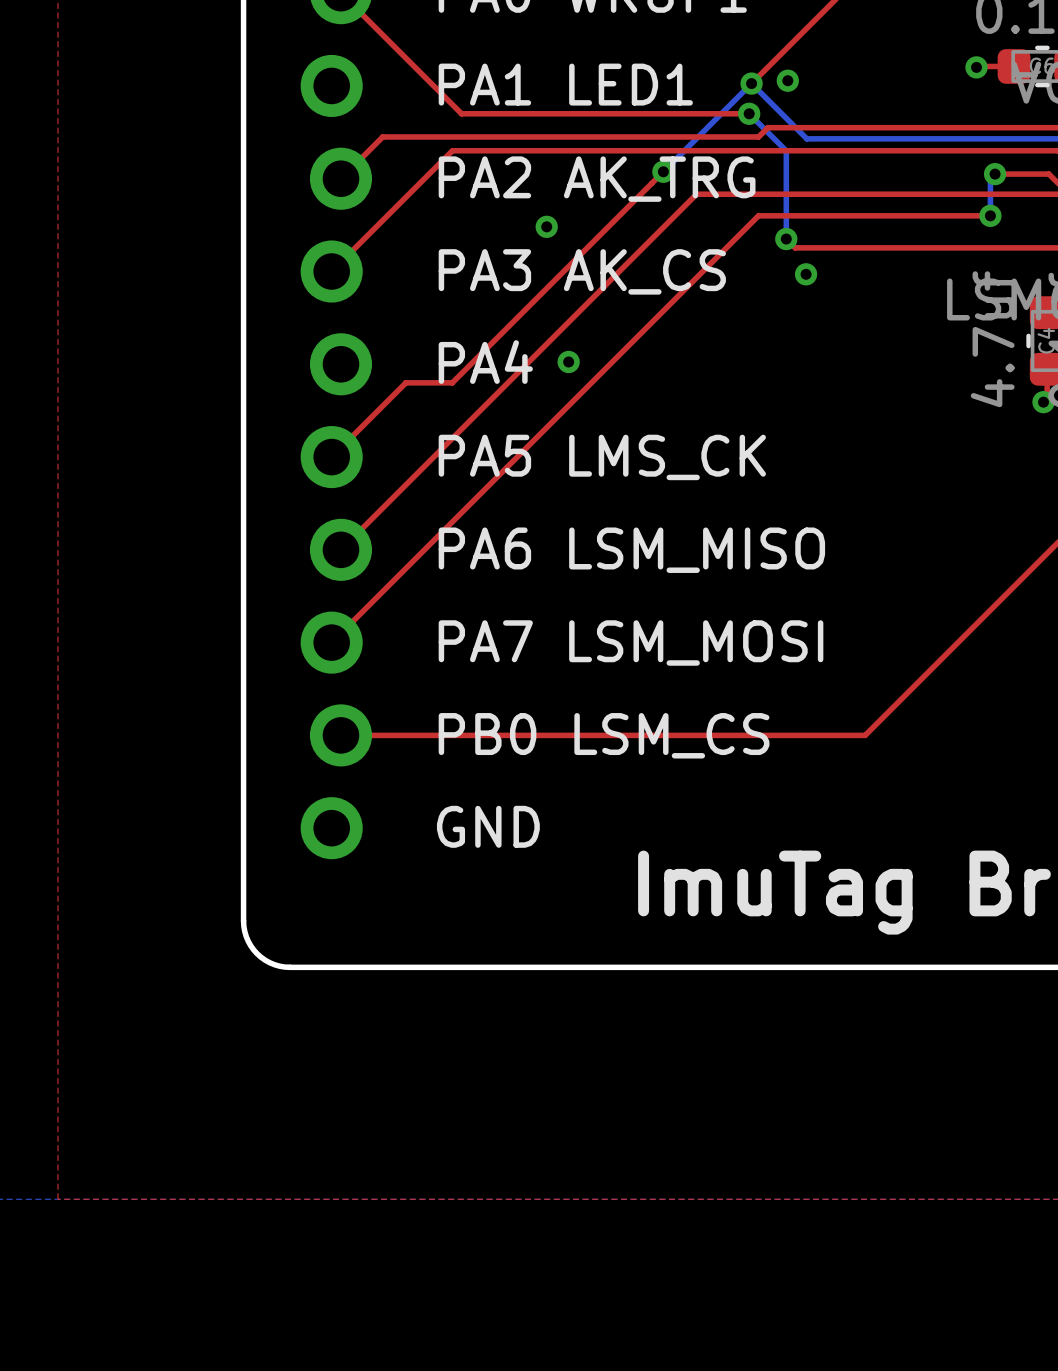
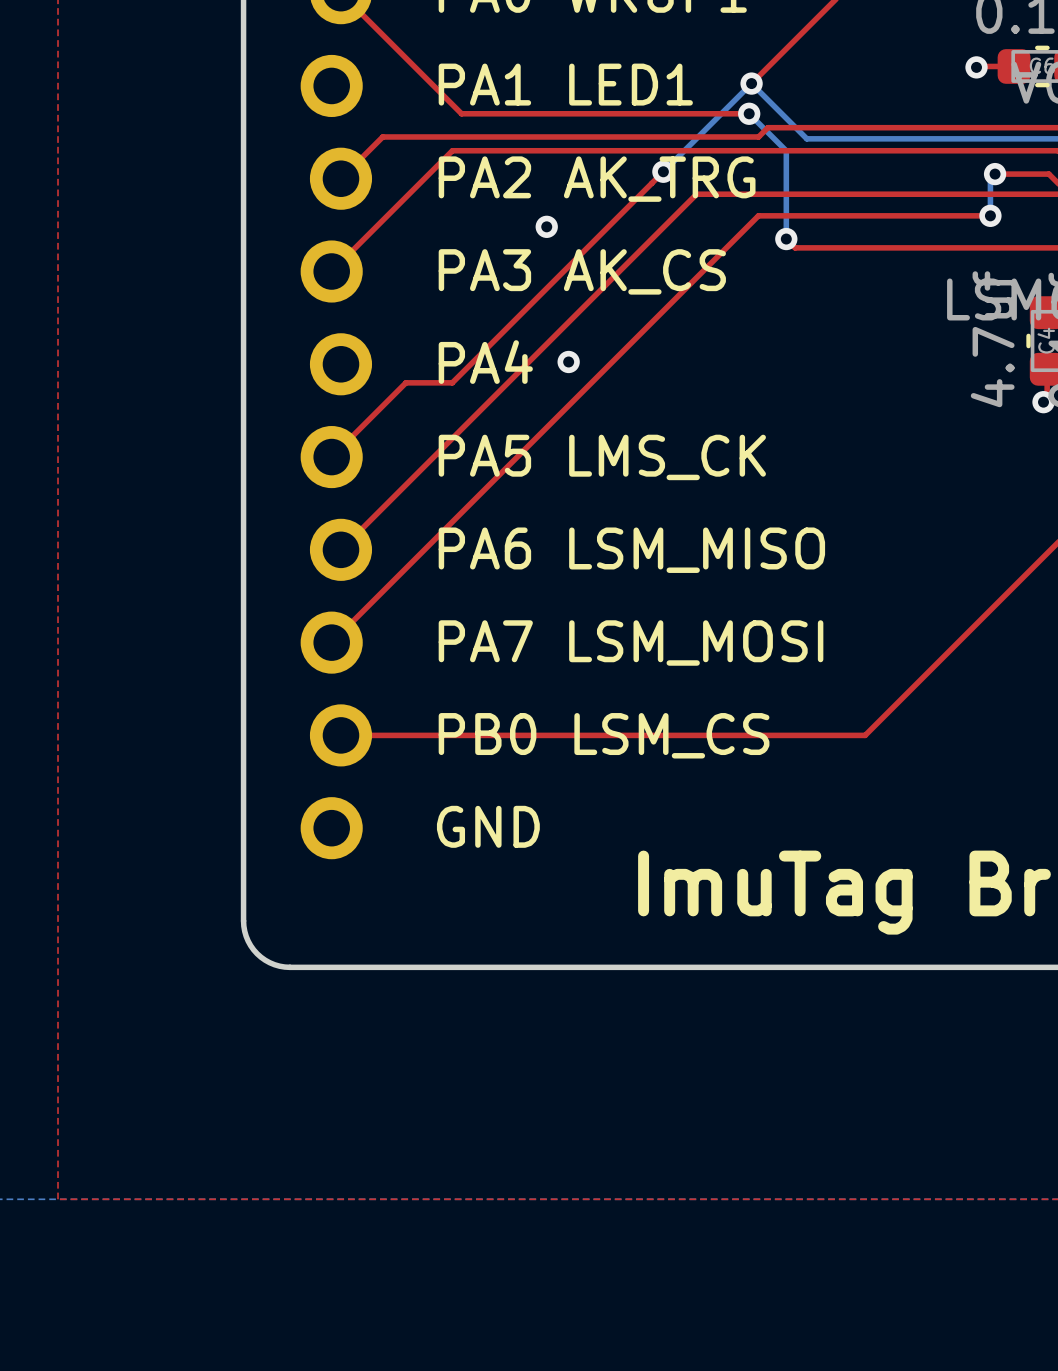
via: (787, 80) -> none
via: (806, 274) -> none

